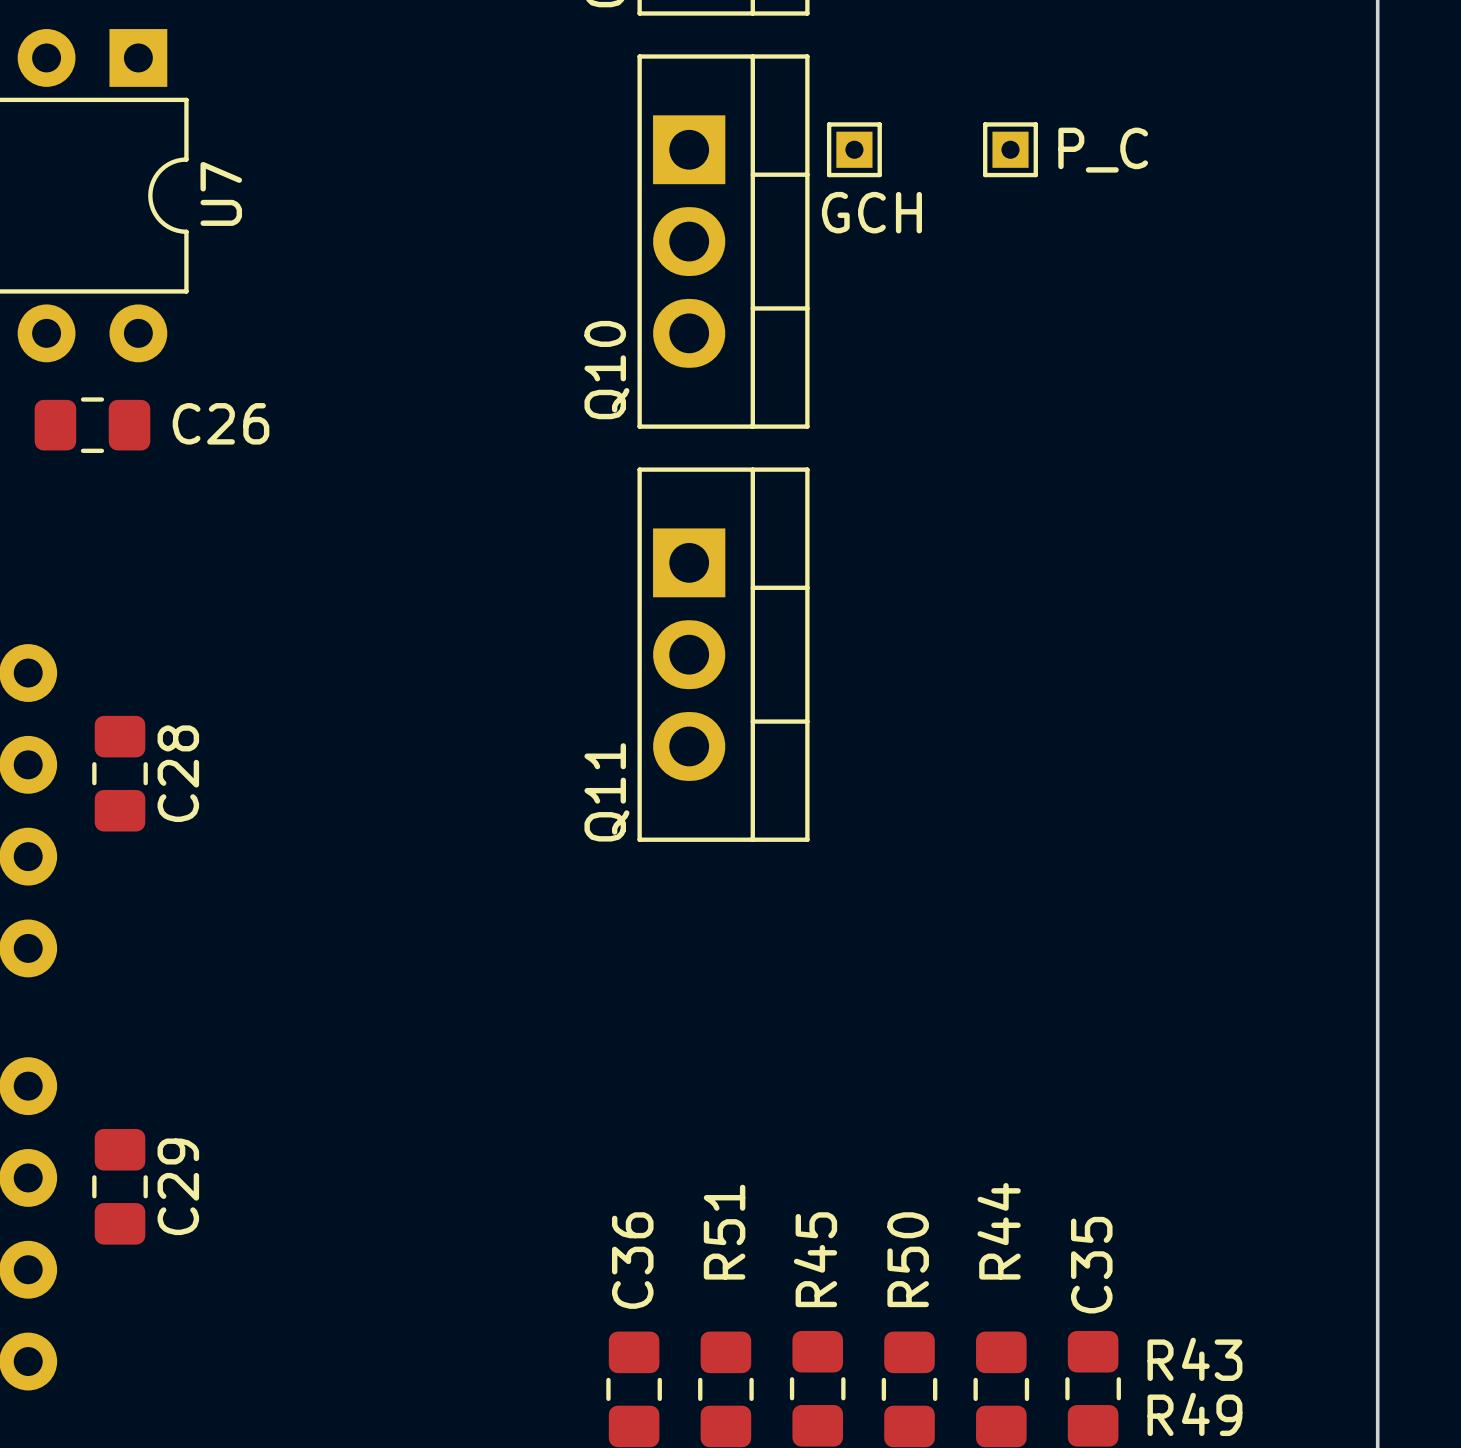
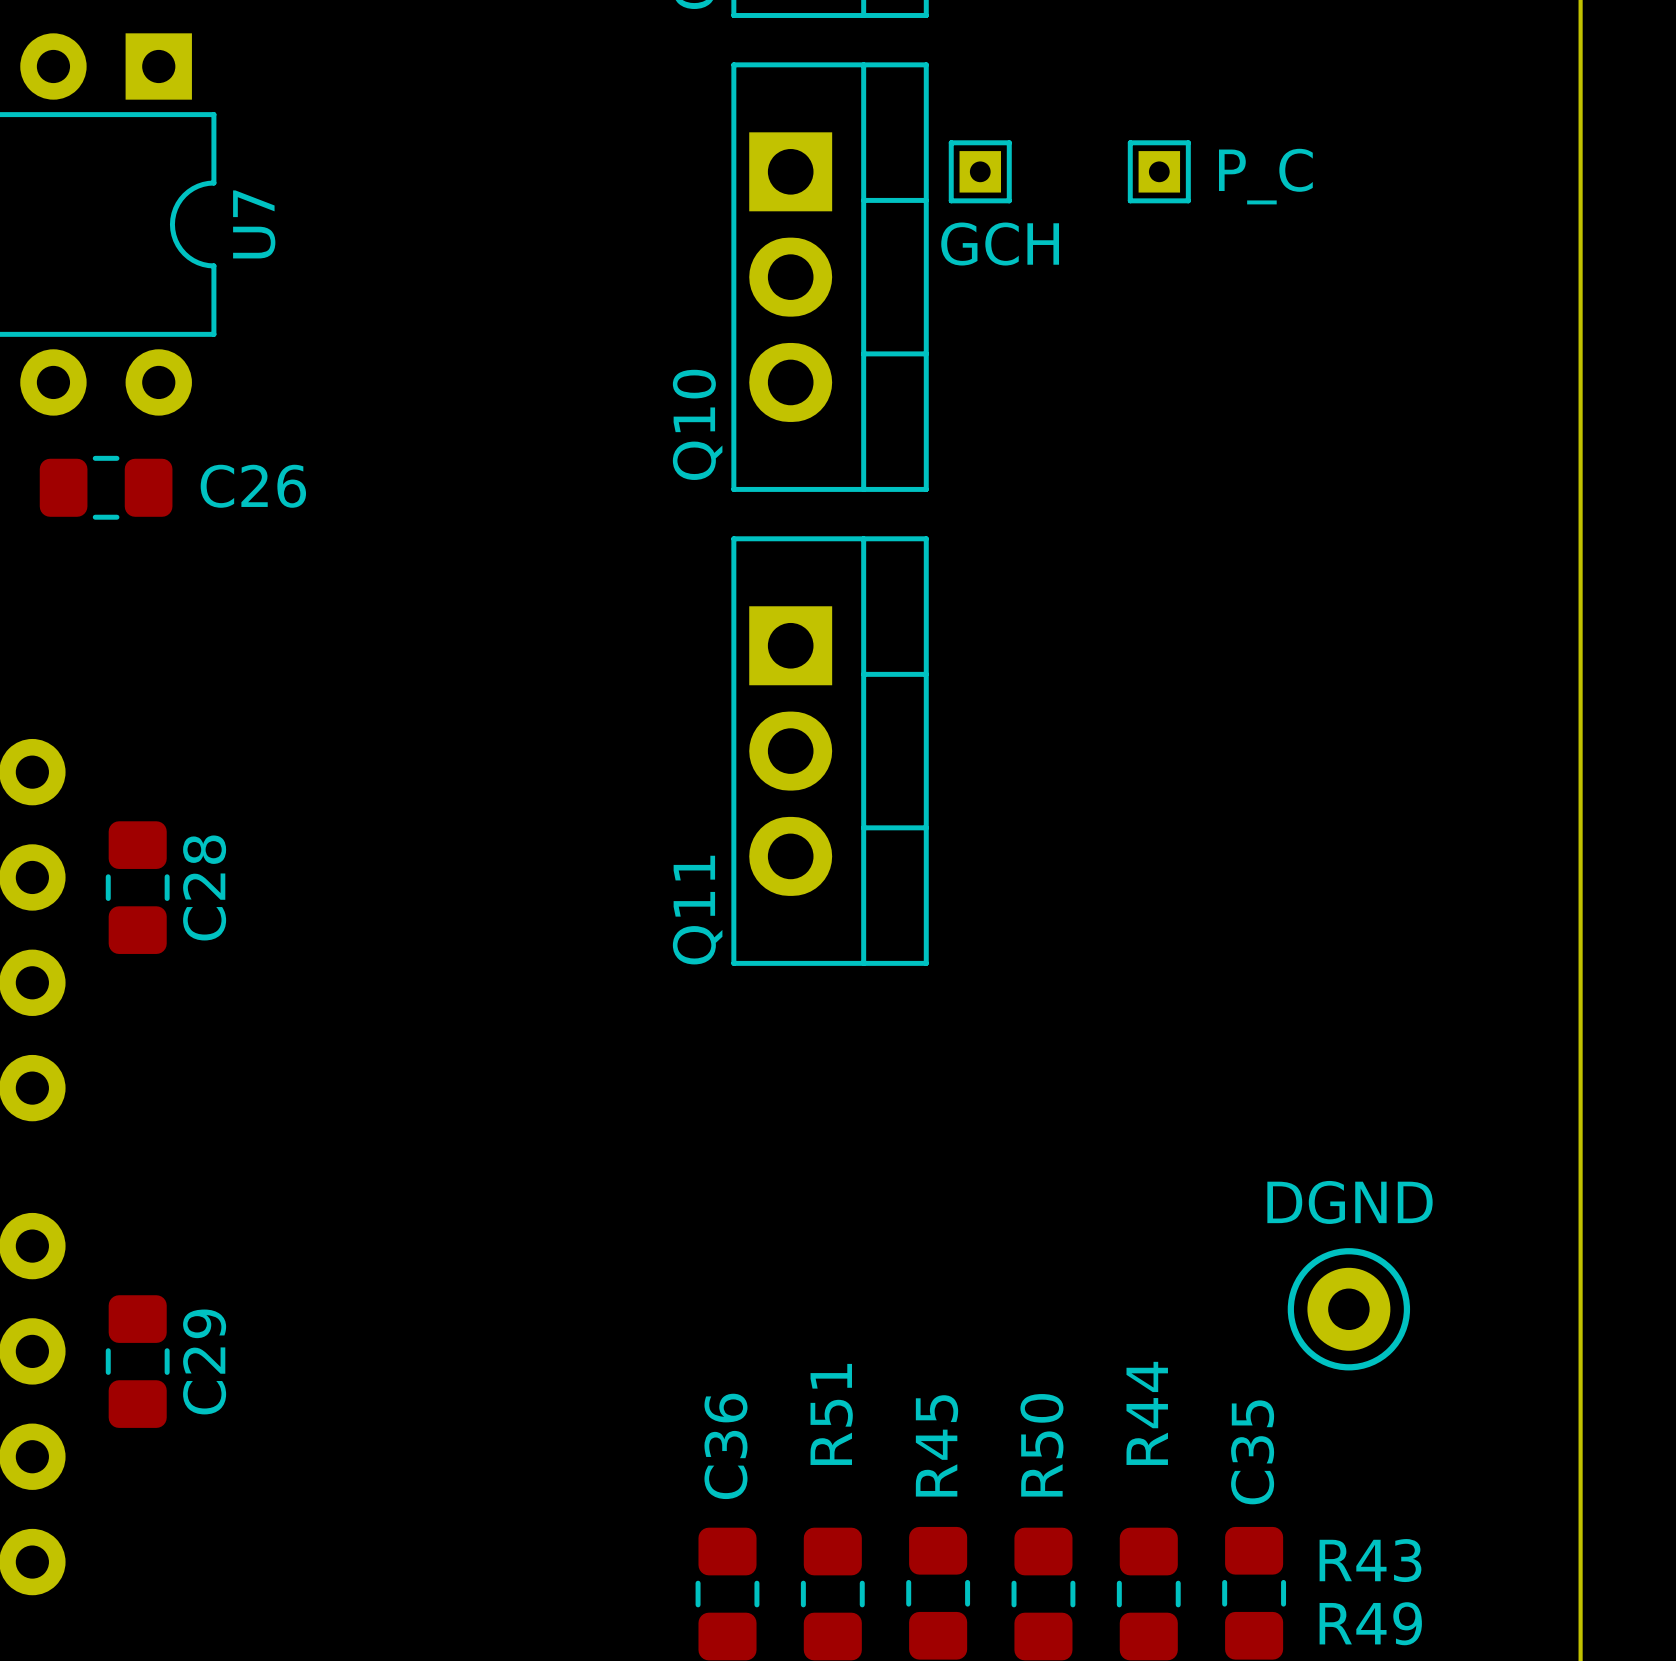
text: none -> DGND (1350, 1202)
part: none -> (1348, 1309)

